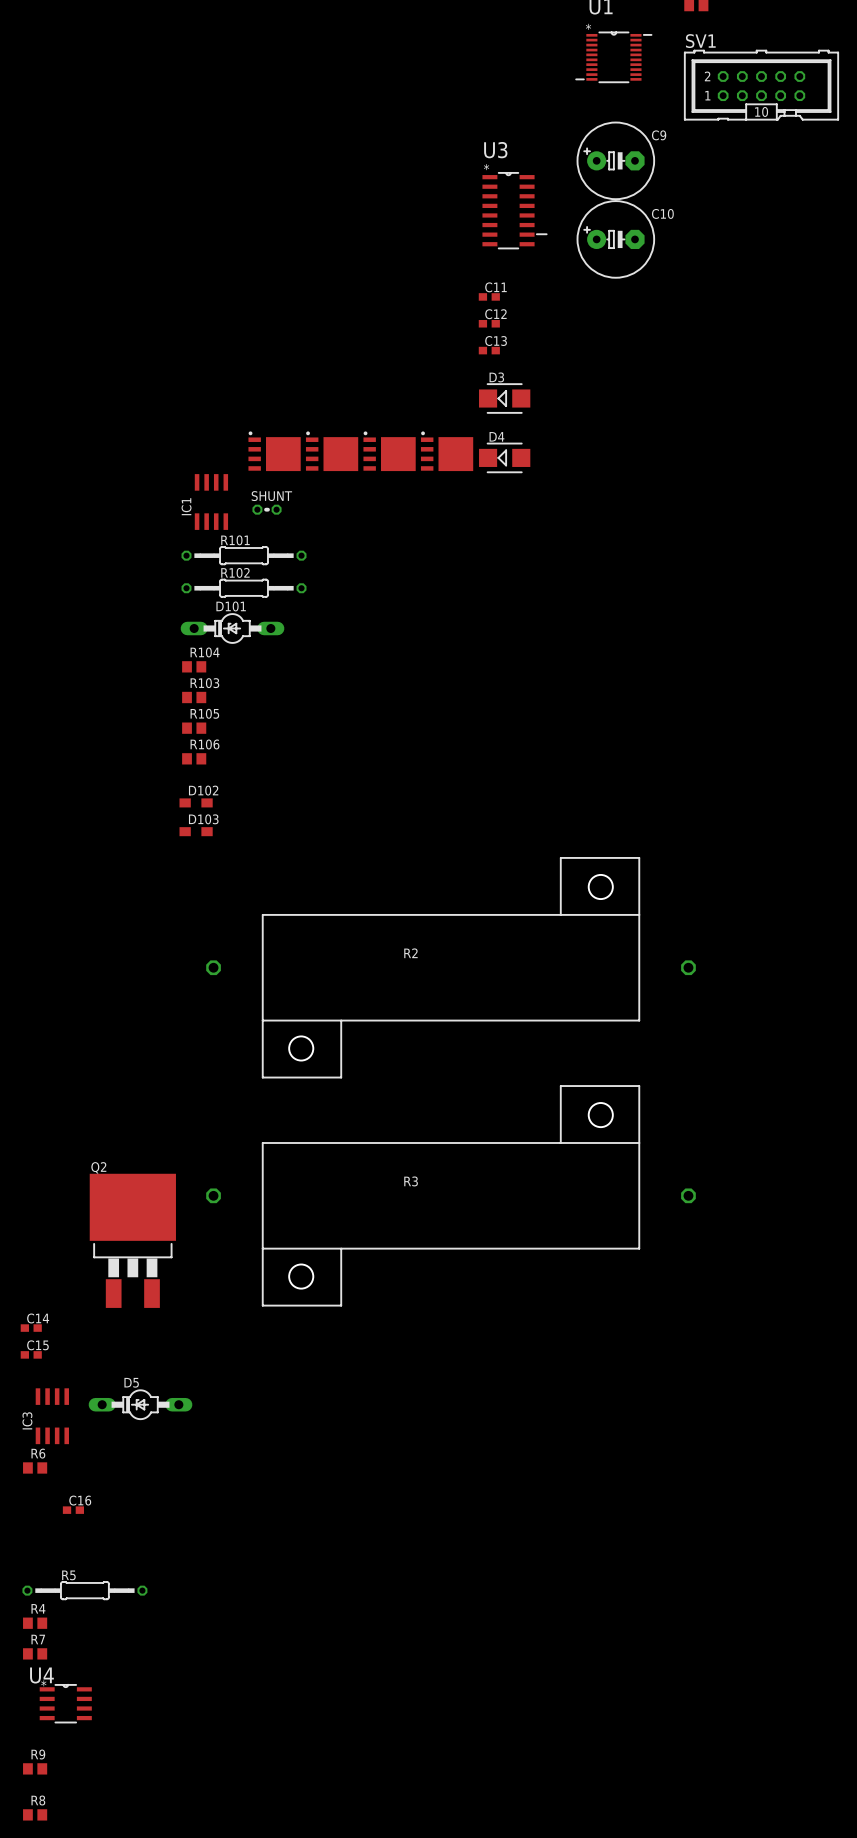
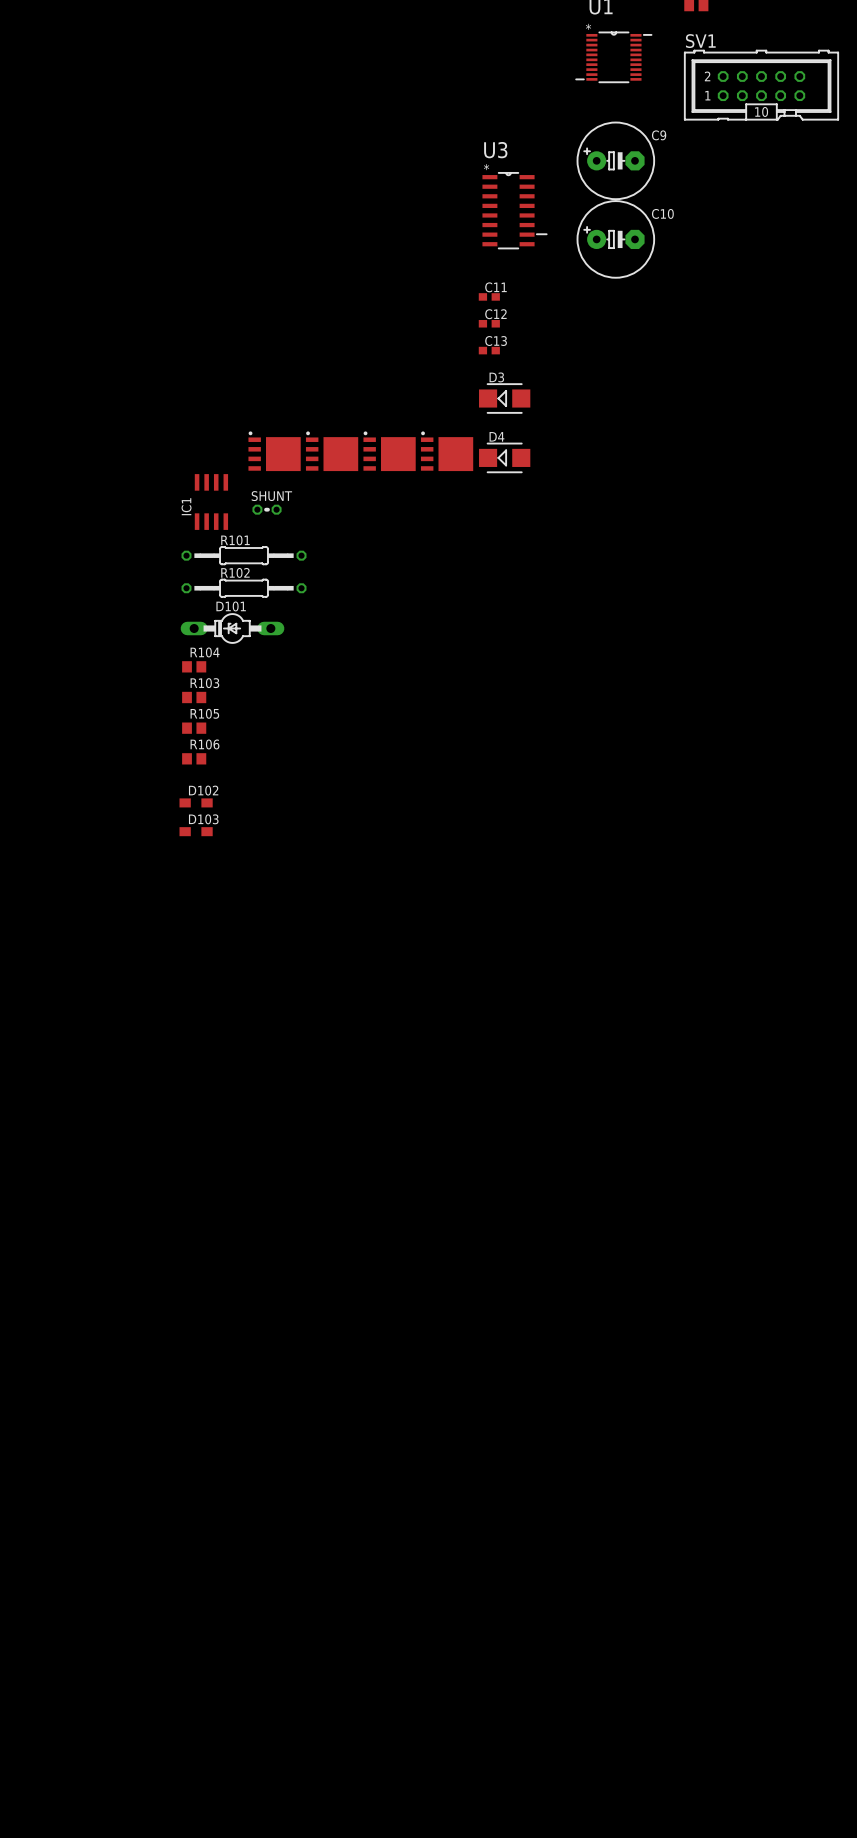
R2: (451, 967) -> none
R3: (451, 1195) -> none
Q2: (132, 1240) -> none
C14: (31, 1328) -> none
C15: (31, 1354) -> none
D5: (140, 1404) -> none
IC3: (52, 1416) -> none
R6: (35, 1467) -> none
C16: (73, 1510) -> none
R5: (84, 1590) -> none
R4: (35, 1623) -> none
R7: (35, 1653) -> none
U4: (65, 1703) -> none
R9: (35, 1768) -> none
R8: (35, 1814) -> none

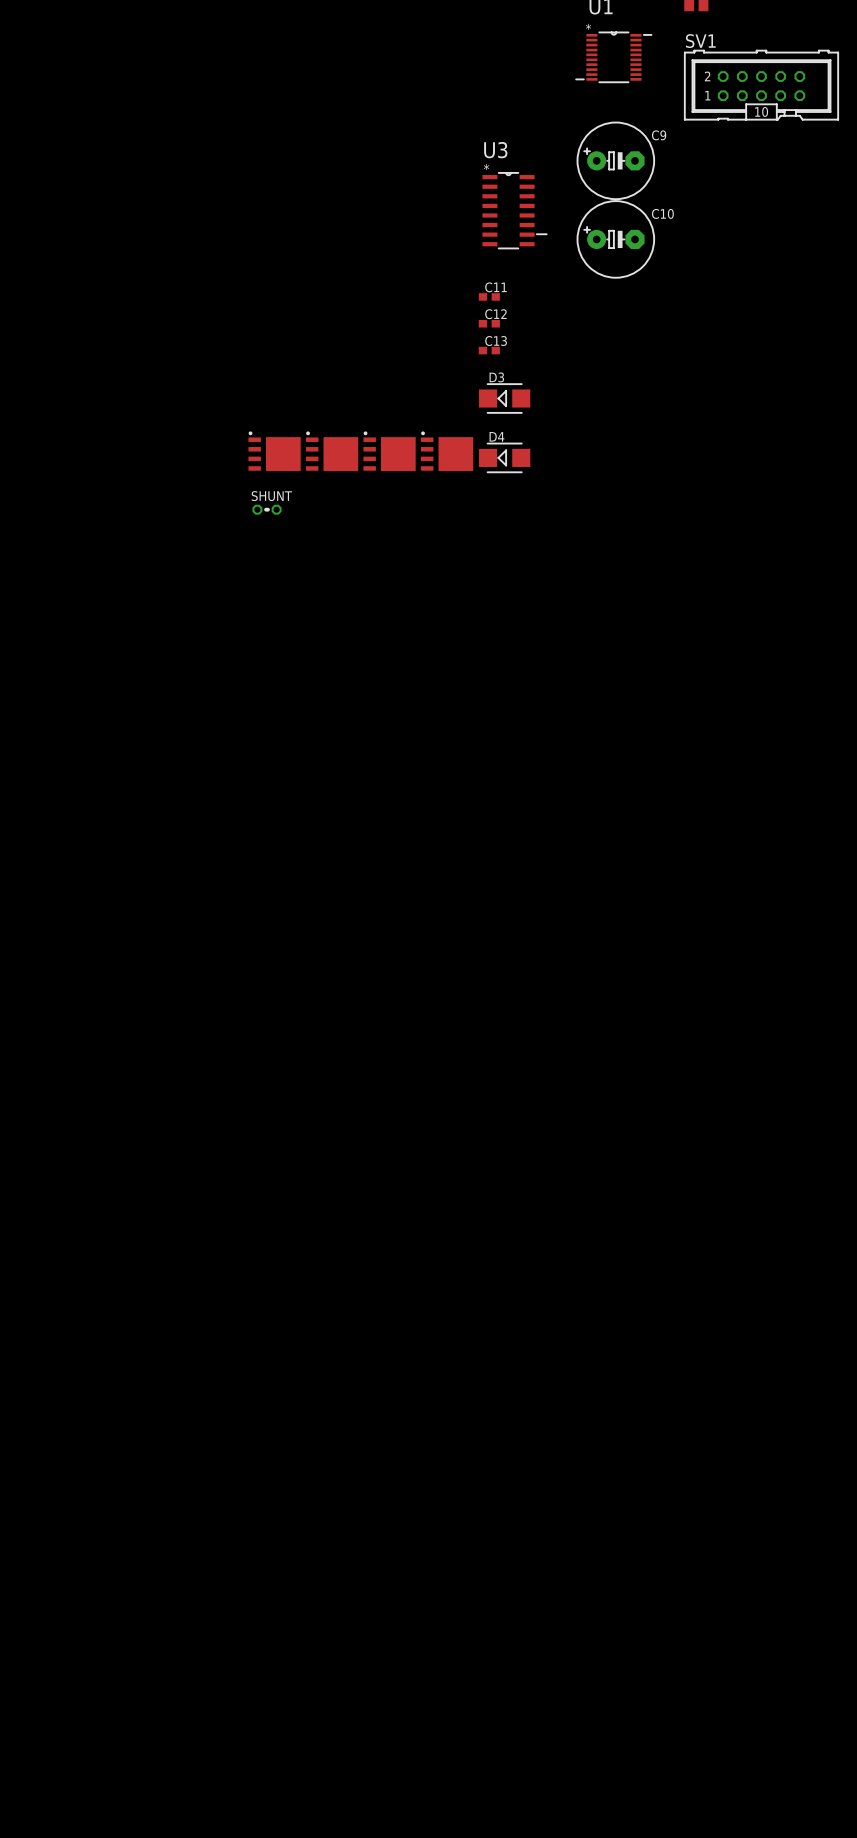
IC1: (211, 502) -> none
R101: (244, 555) -> none
R102: (244, 588) -> none
D101: (232, 628) -> none
R104: (194, 666) -> none
R103: (194, 697) -> none
R105: (194, 728) -> none
R106: (194, 758) -> none
D102: (196, 802) -> none
D103: (196, 831) -> none

